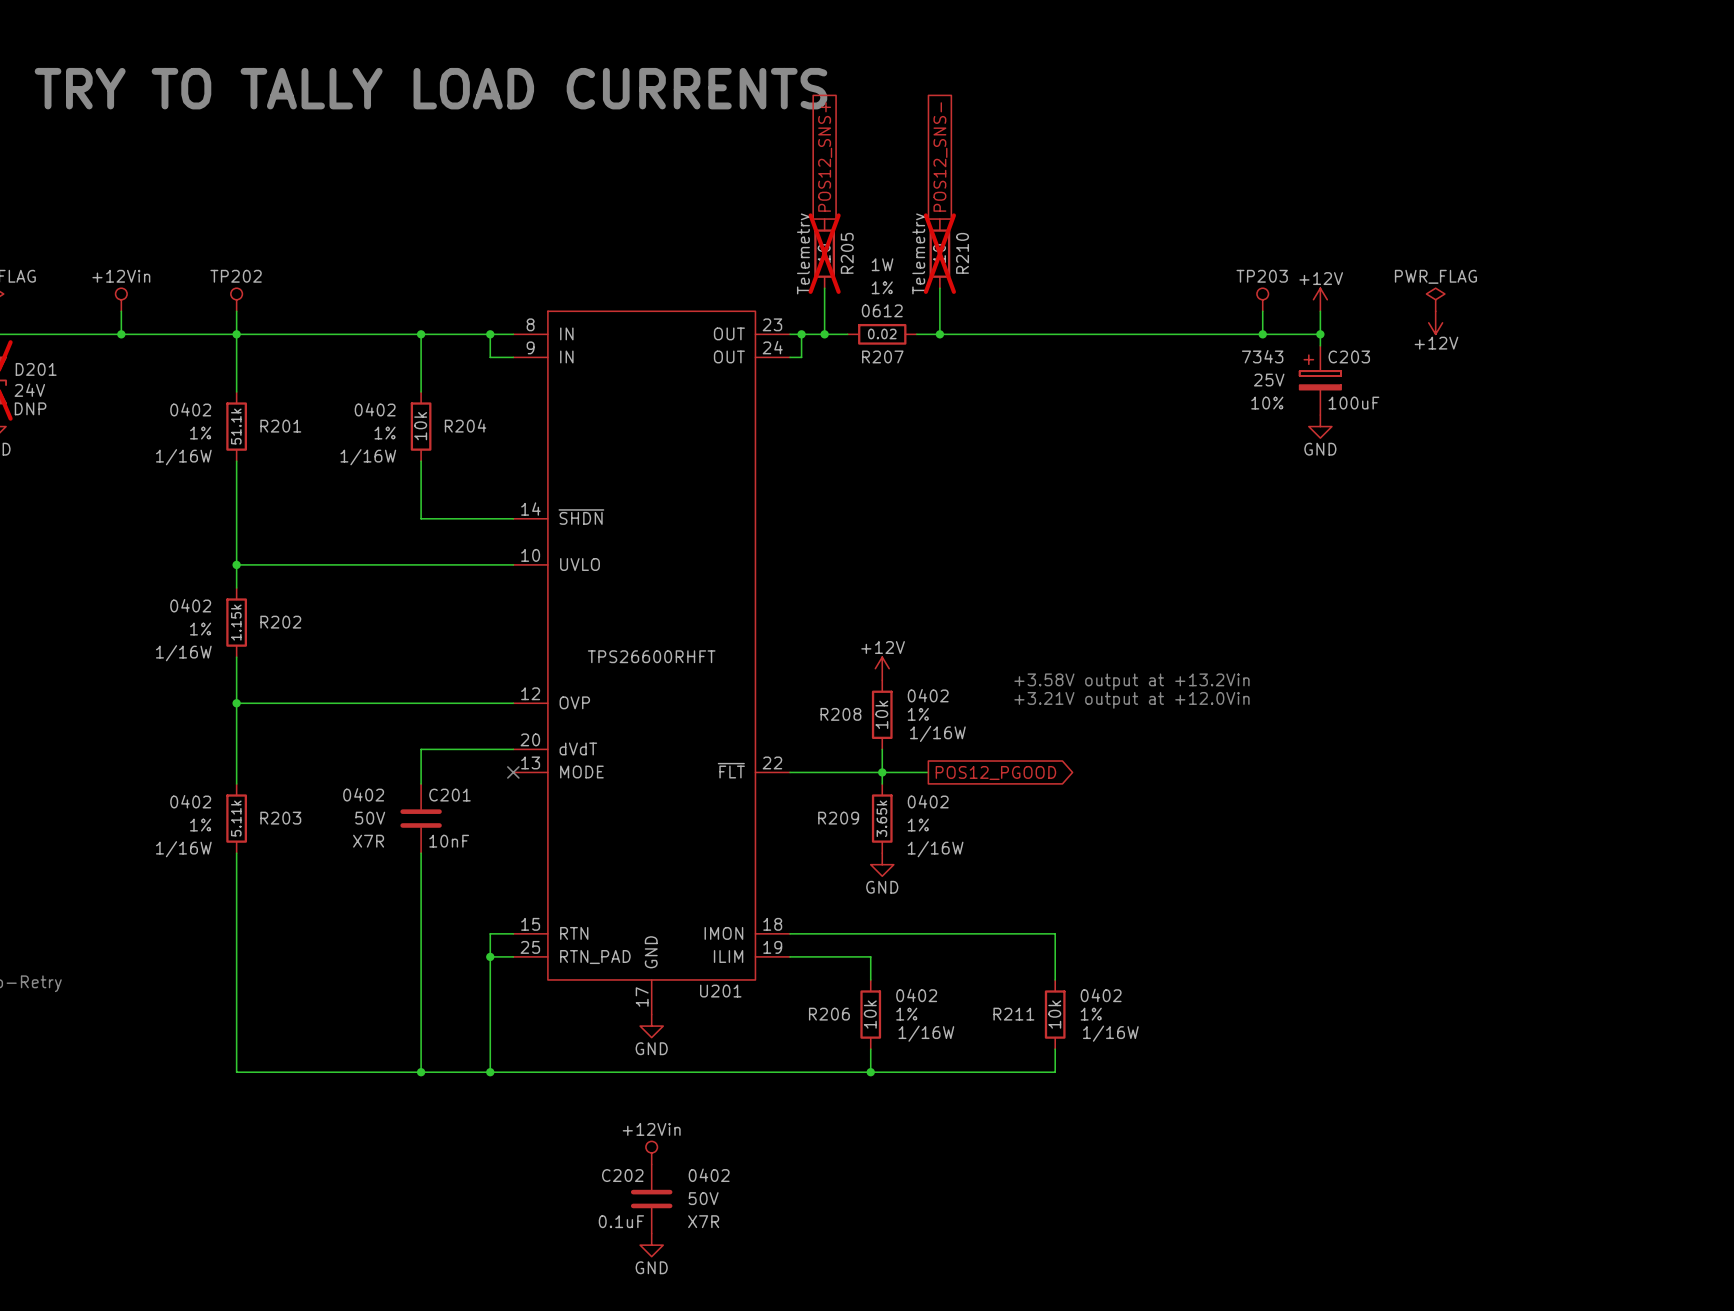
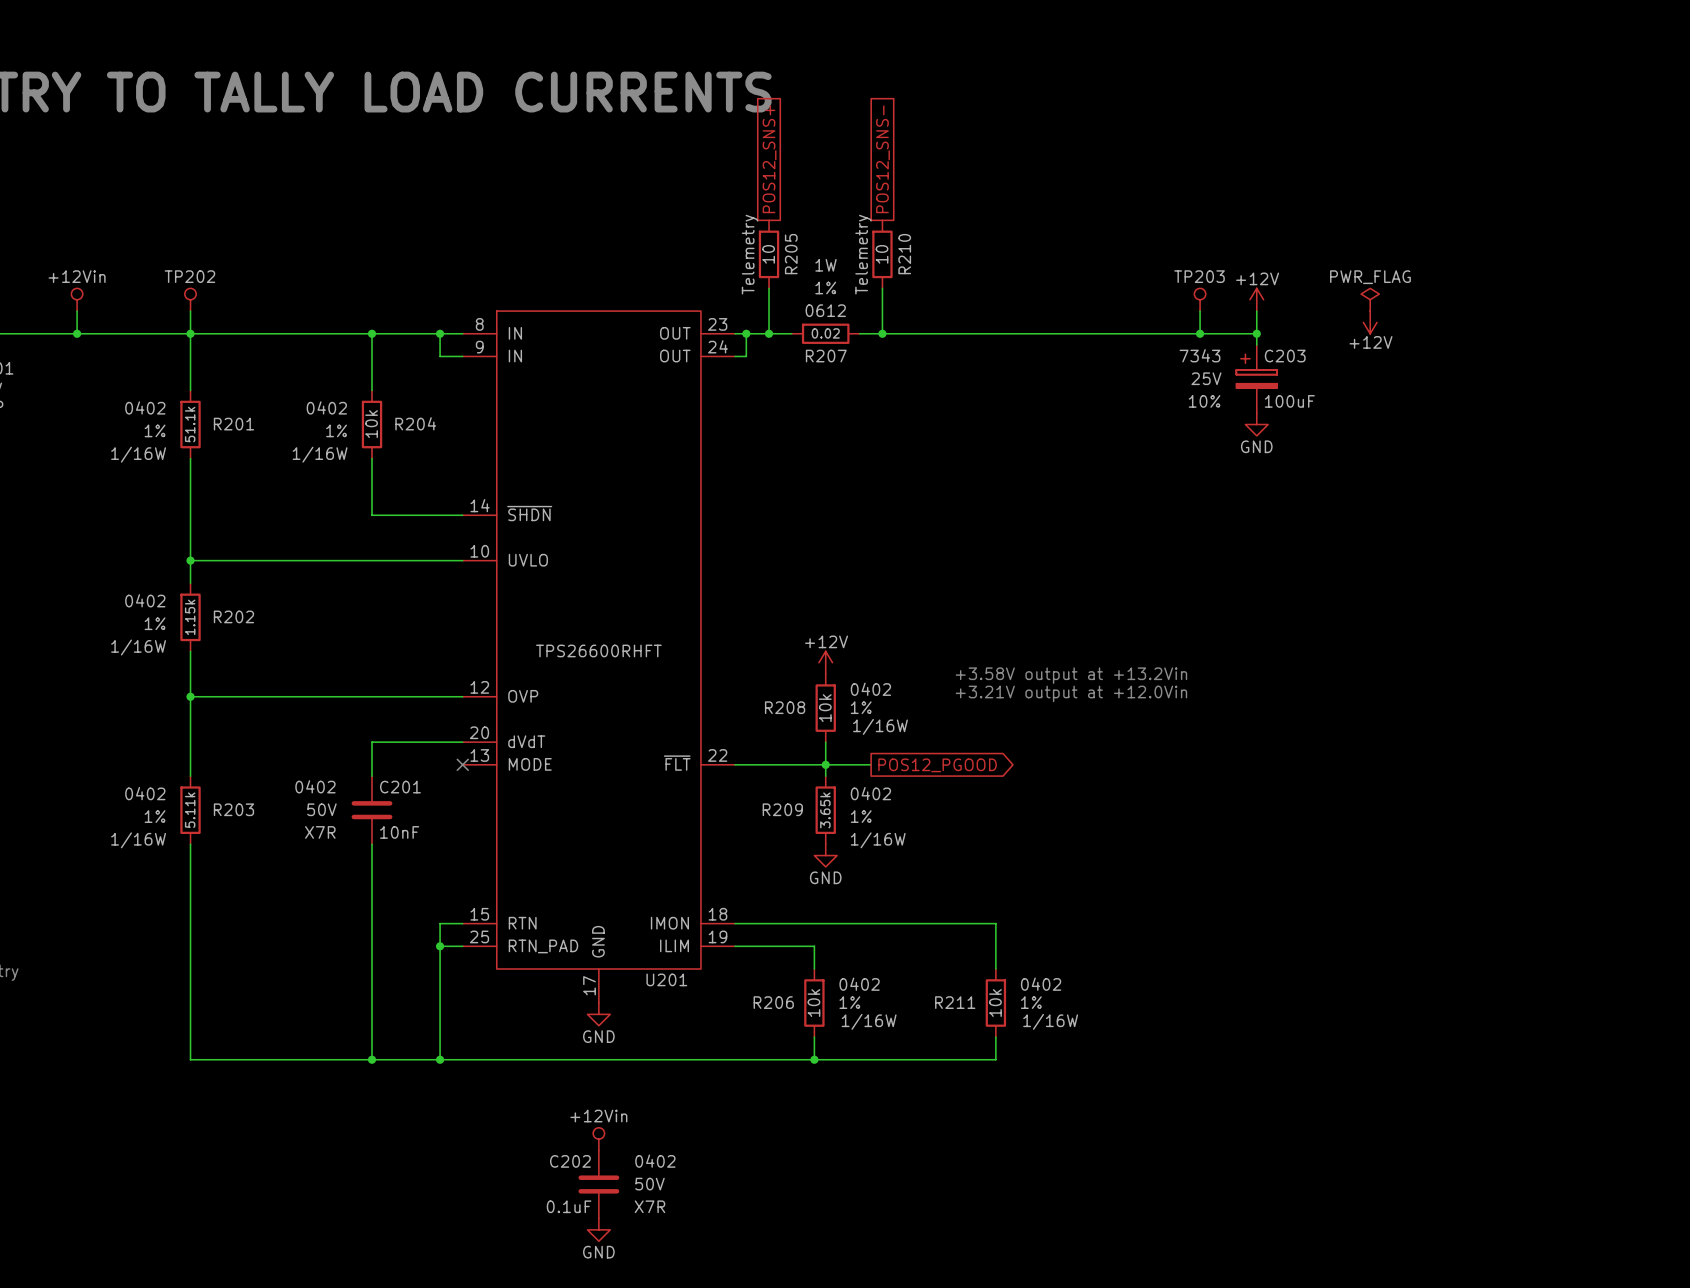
R205 do-not-place cross: (824, 253) -> none
R210 do-not-place cross: (939, 253) -> none

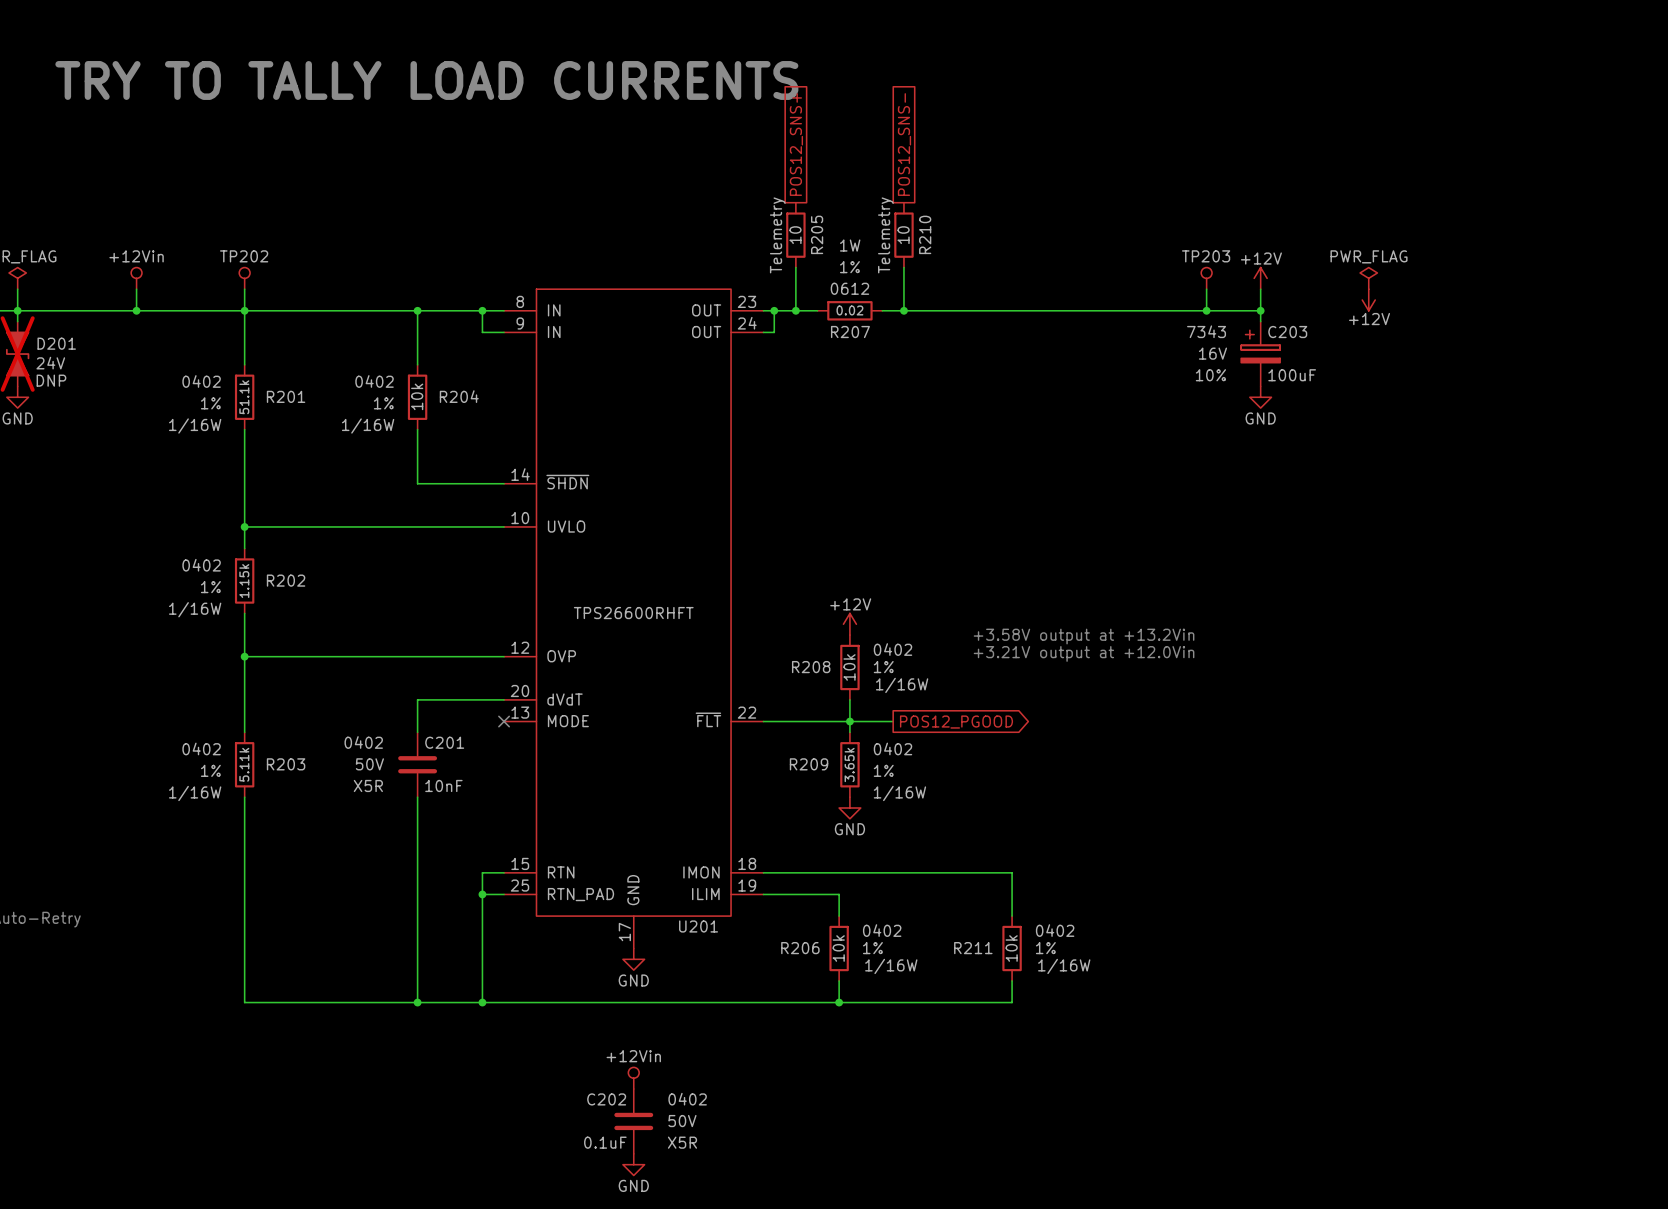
C203 text: 25V (1206, 378) -> 16V (1212, 353)
C201 text: X7R (320, 832) -> X5R (368, 785)
C202 text: X7R (650, 1206) -> X5R (682, 1142)

